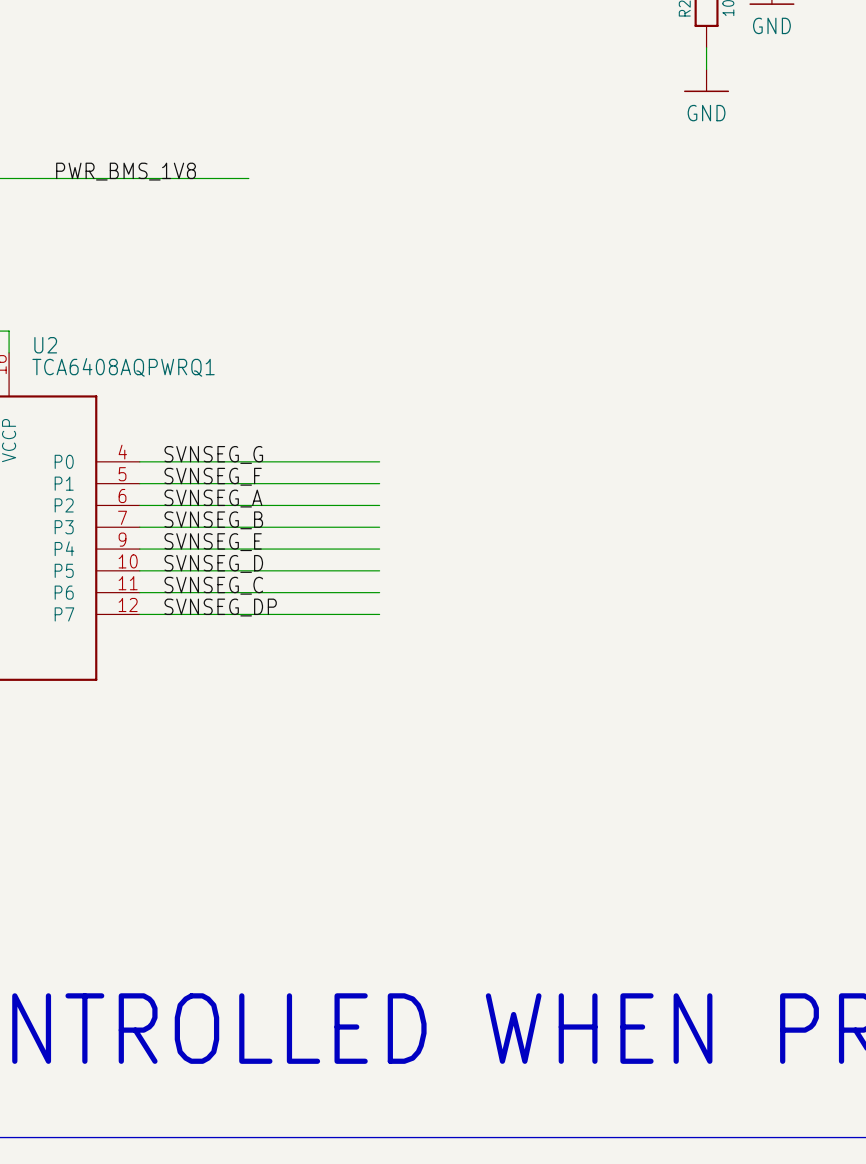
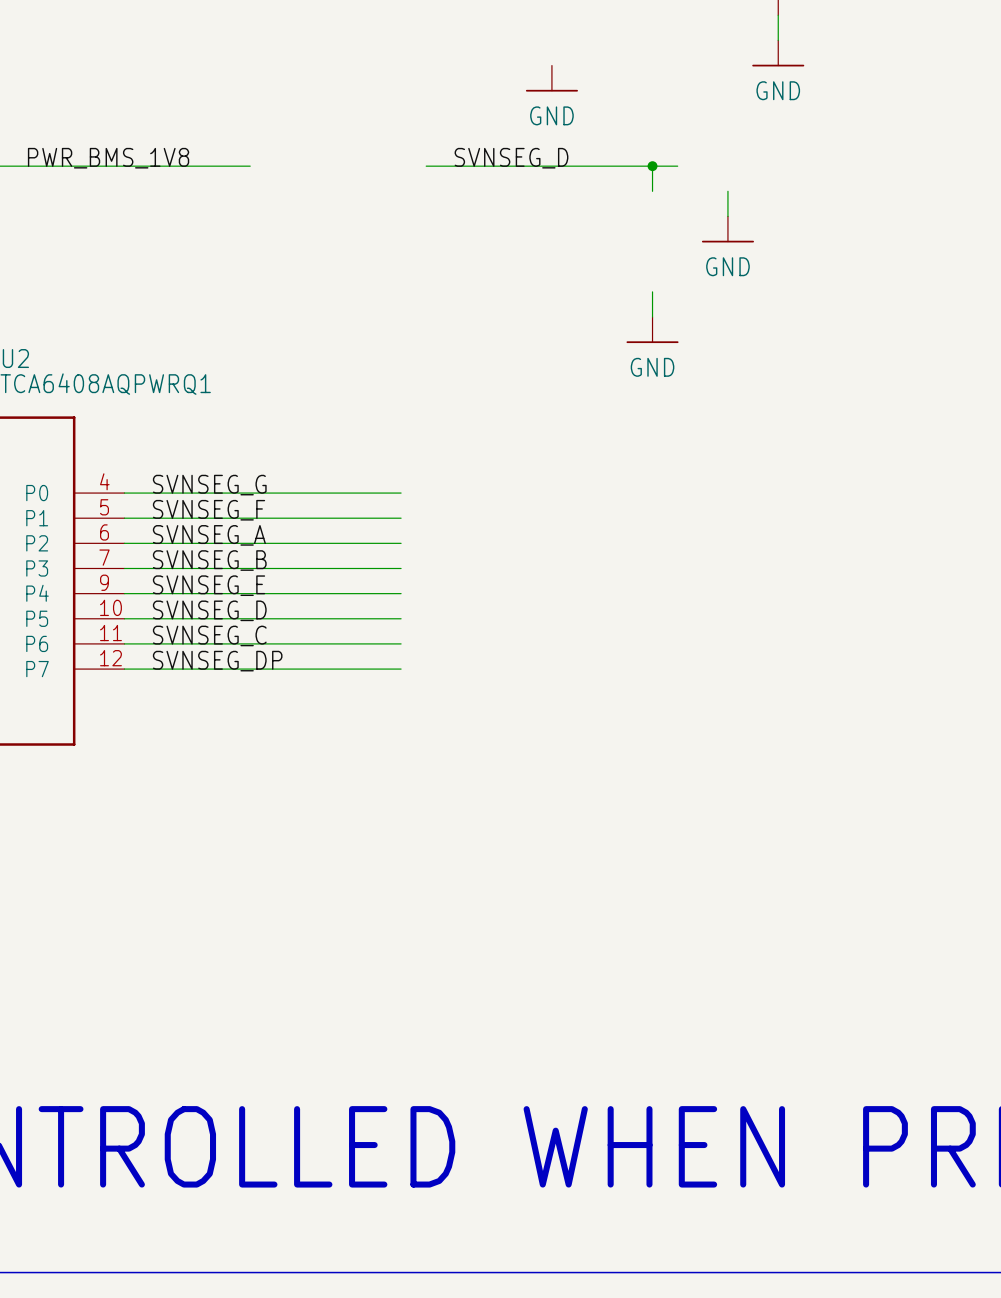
power symbol: none -> GND (551, 78)
label: none -> SVNSEG_D (511, 158)
wire: none -> (426, 166) (677, 166)
wire: none -> (652, 166) (652, 191)
junction: none -> (652, 166)
wire: none -> (727, 191) (727, 216)
power symbol: none -> GND (727, 229)
wire: none -> (652, 291) (652, 317)
power symbol: none -> GND (652, 330)

